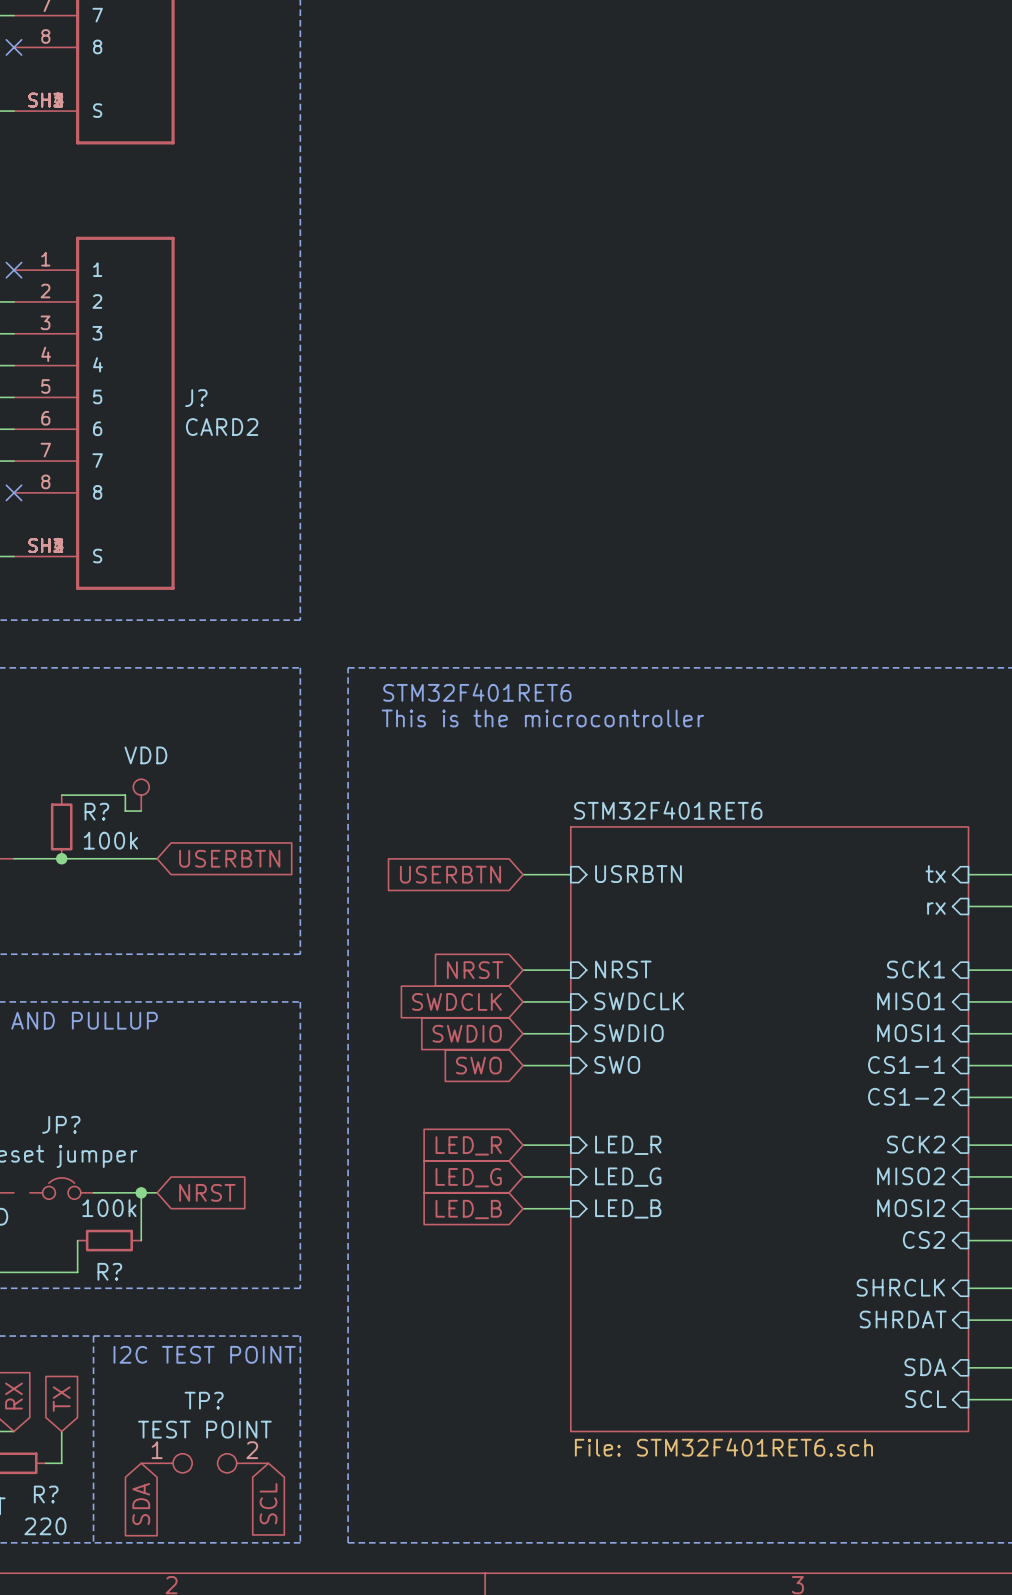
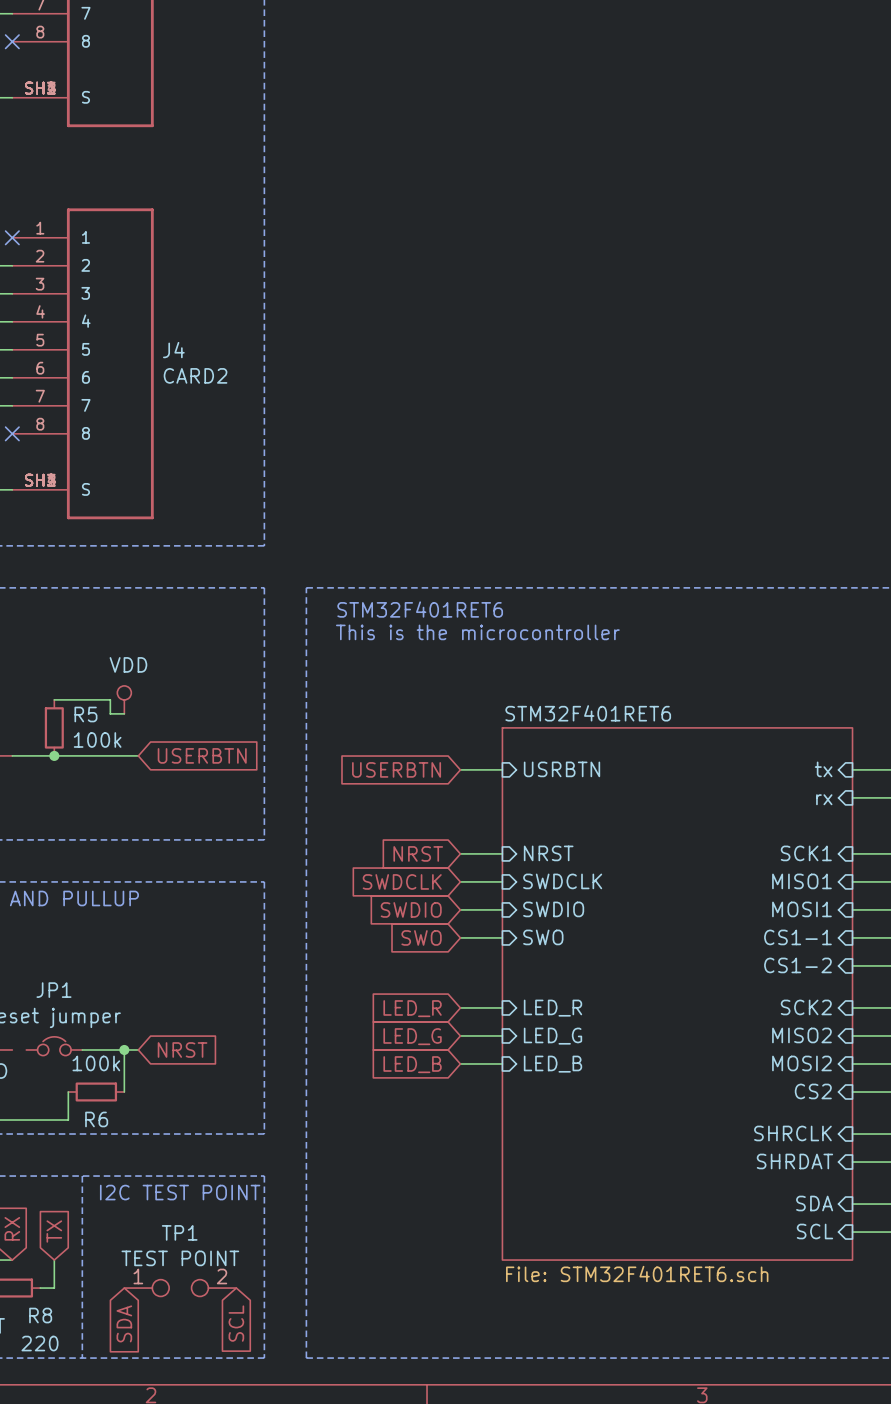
J? name: J? (196, 398) -> J4 (173, 350)
R? name: R? (96, 811) -> R5 (85, 714)
JP? name: JP? (61, 1124) -> JP1 (53, 990)
R? name: R? (109, 1271) -> R6 (96, 1119)
TP? name: TP? (204, 1400) -> TP1 (179, 1232)
R? name: R? (46, 1494) -> R8 (40, 1315)

